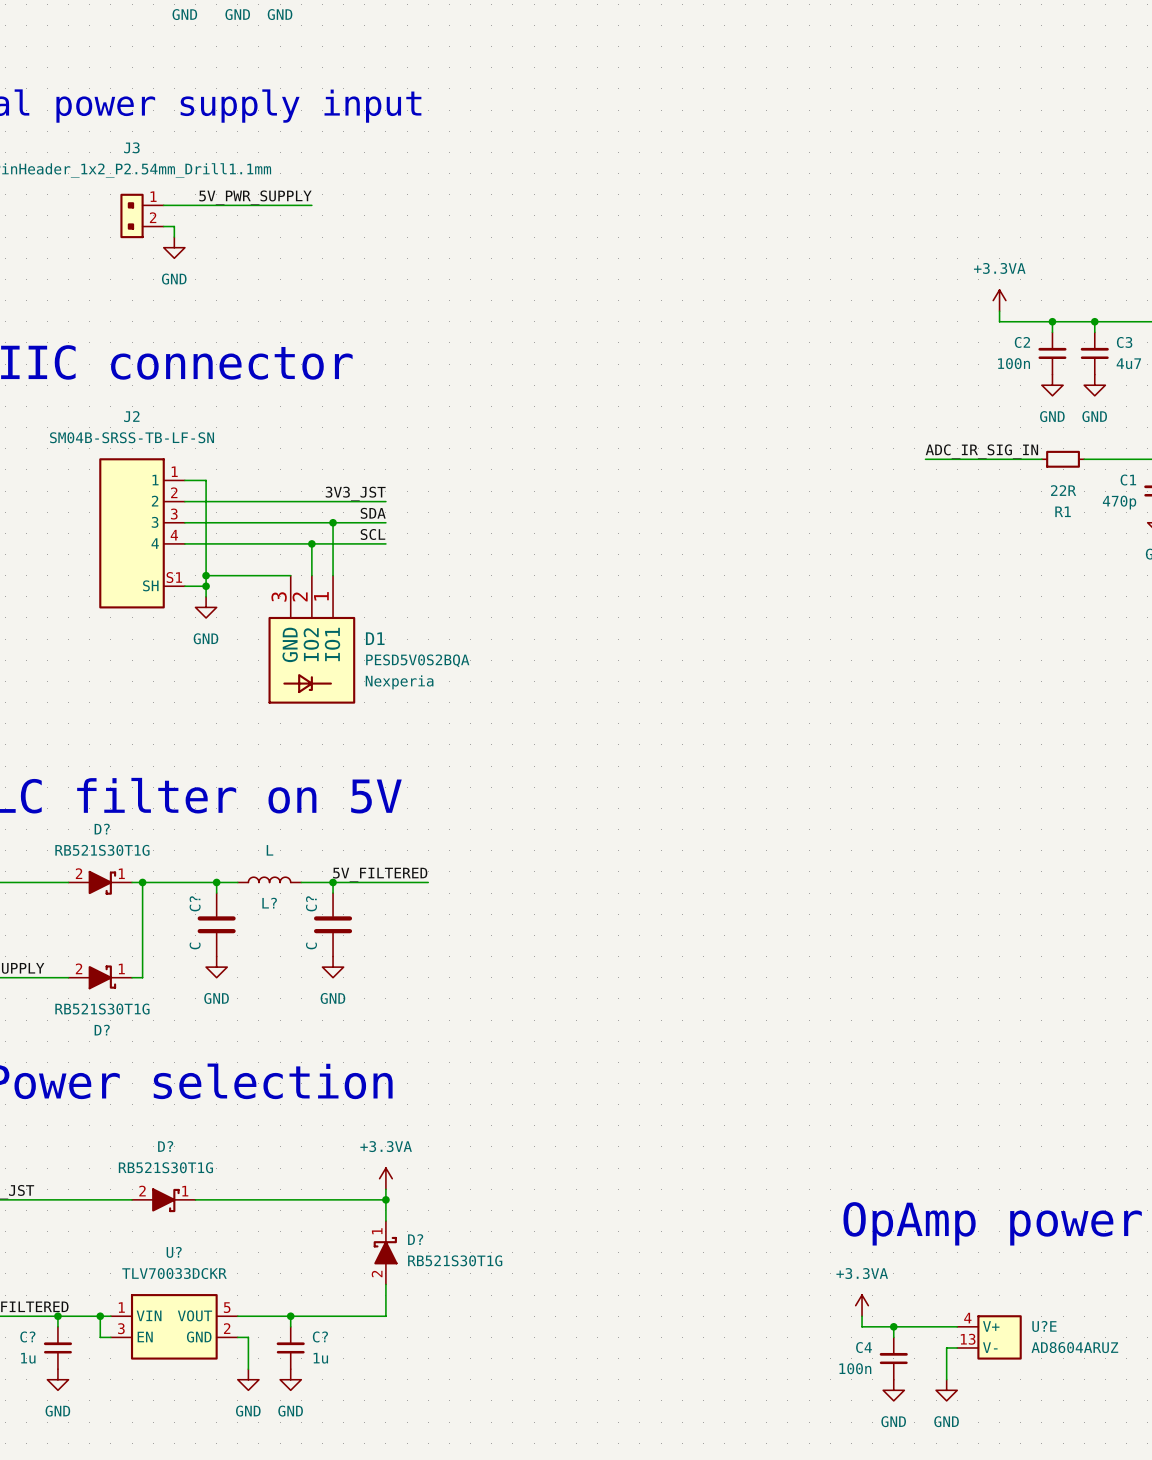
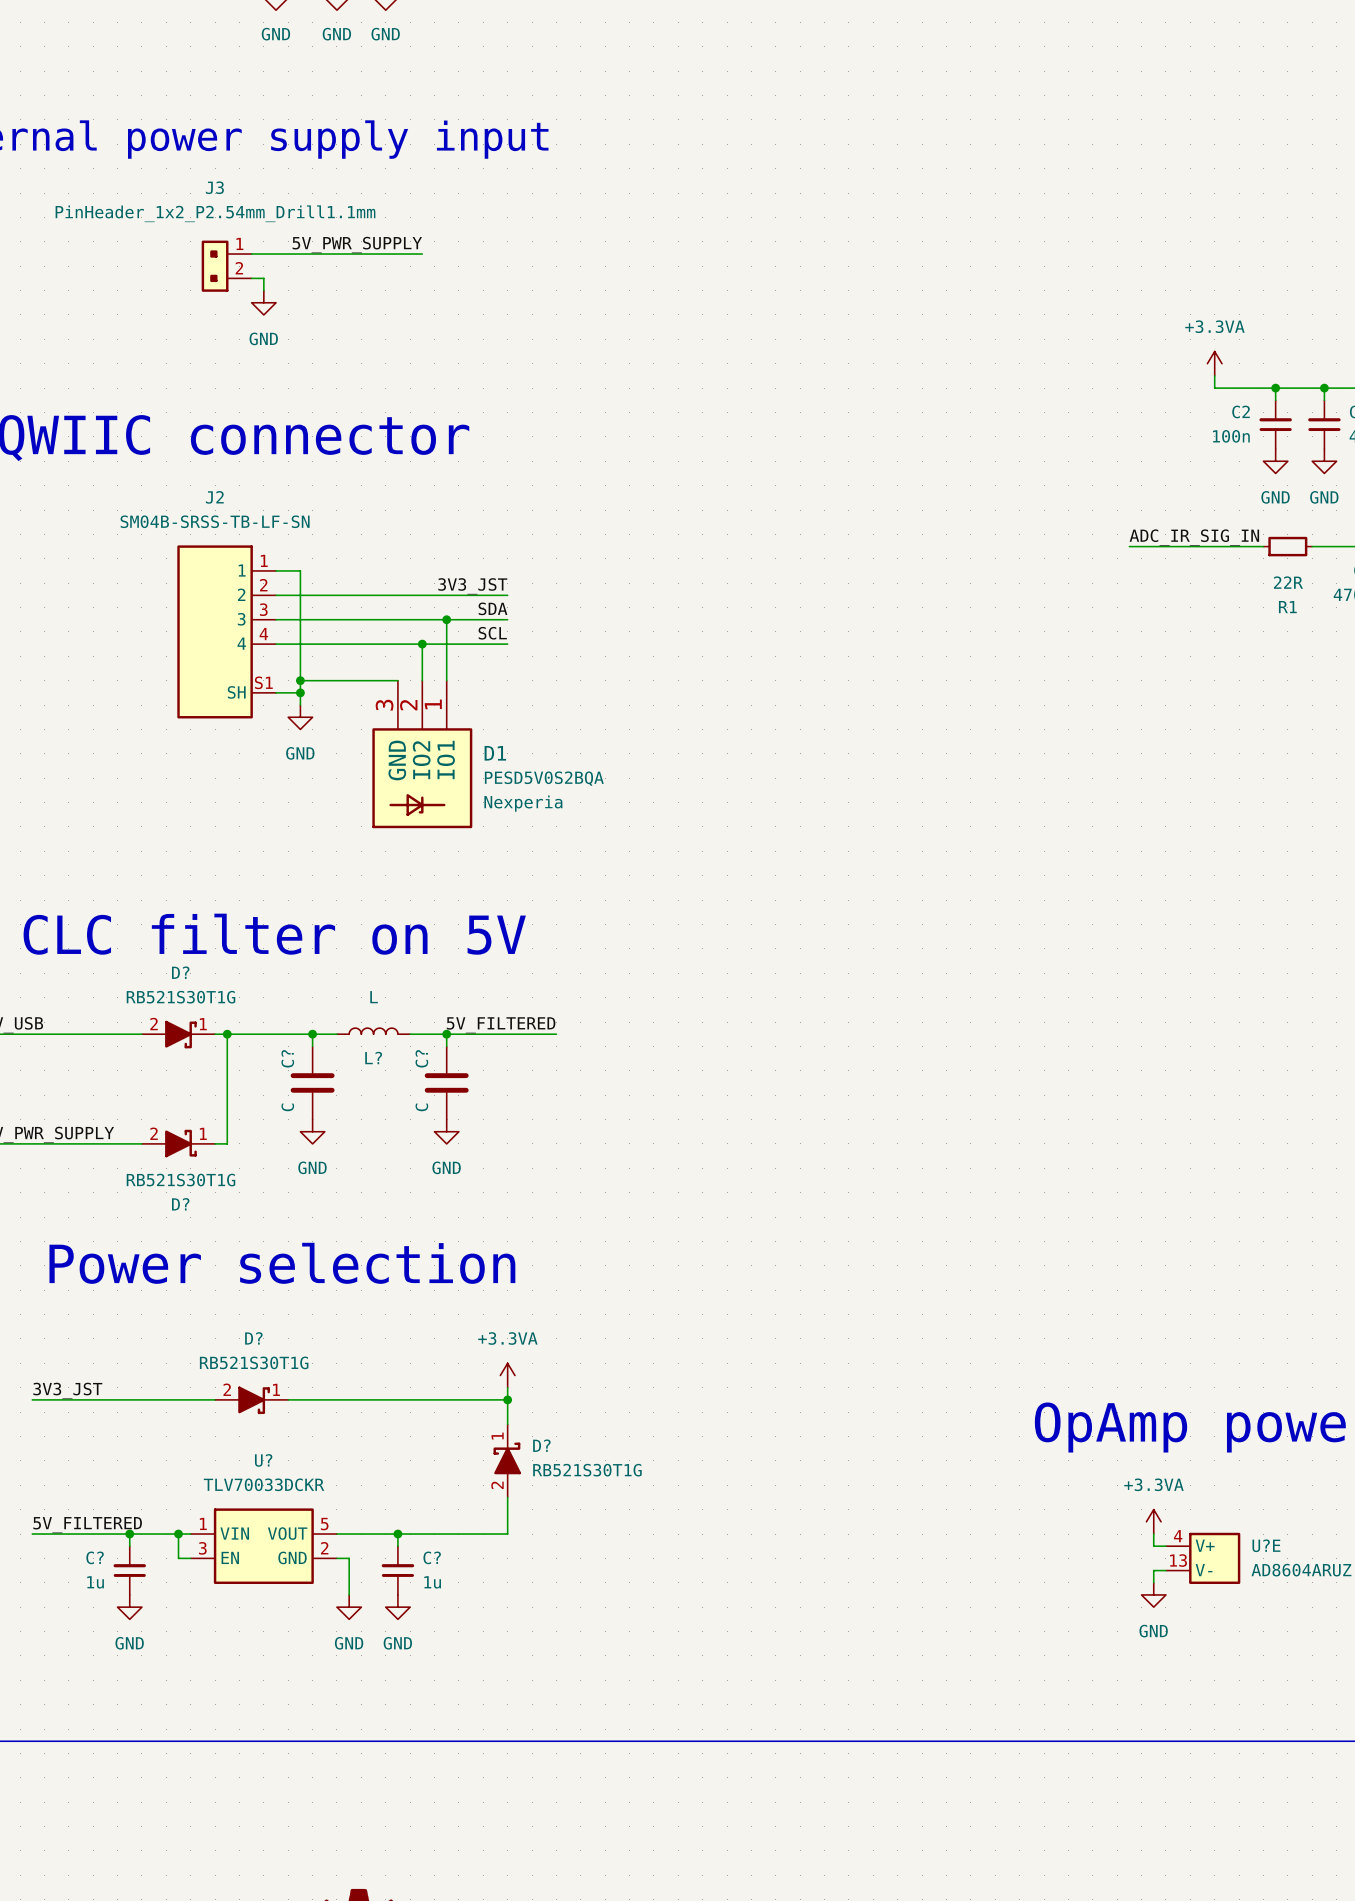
power symbol position: +3.3VA (862, 1305) -> +3.3VA (1153, 1521)
wire: (862, 1316) (862, 1326) (946, 1326) -> (1153, 1534) (1153, 1546)
wire: (893, 1326) (893, 1337) -> none
junction: (893, 1326) -> none
C4: (893, 1358) -> none
power symbol: GND (893, 1390) -> none
power symbol position: GND (946, 1390) -> GND (1153, 1594)

